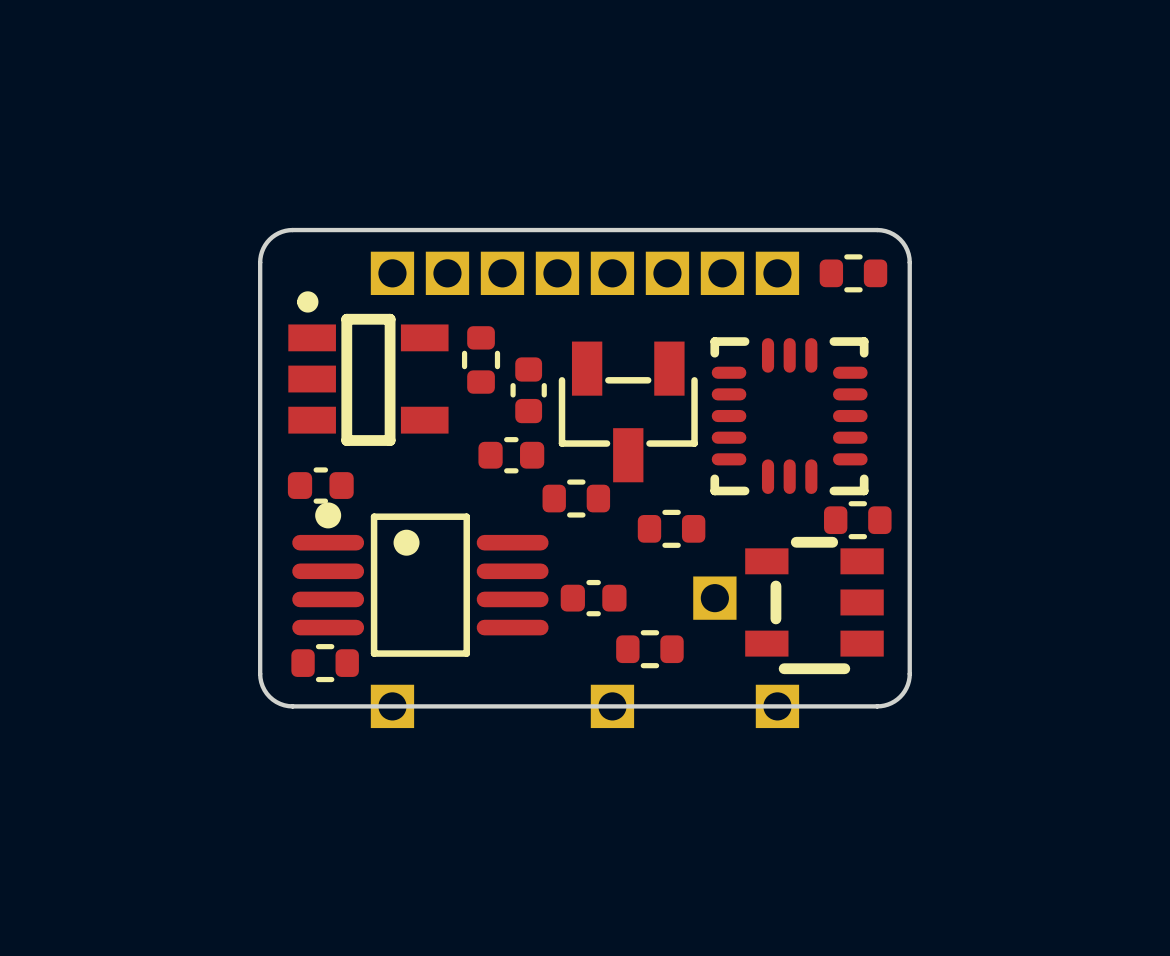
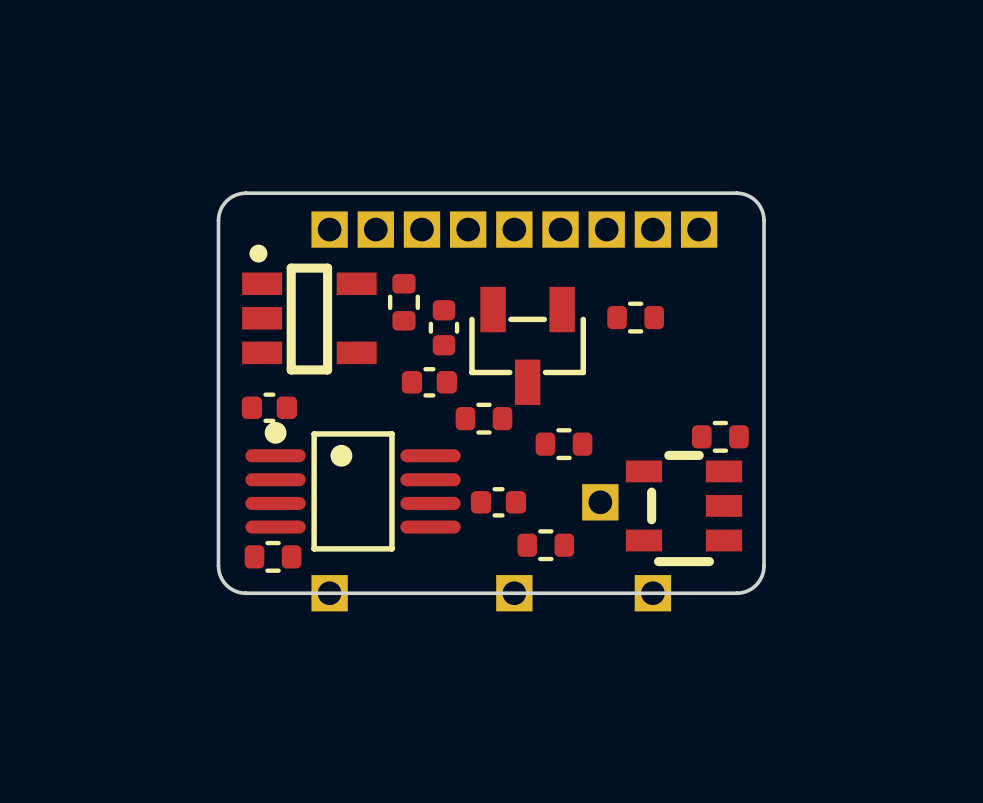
part footprint: [819, 254, 888, 293] -> [680, 211, 718, 248]
part: none -> (635, 317)
part: (797, 416) -> none

